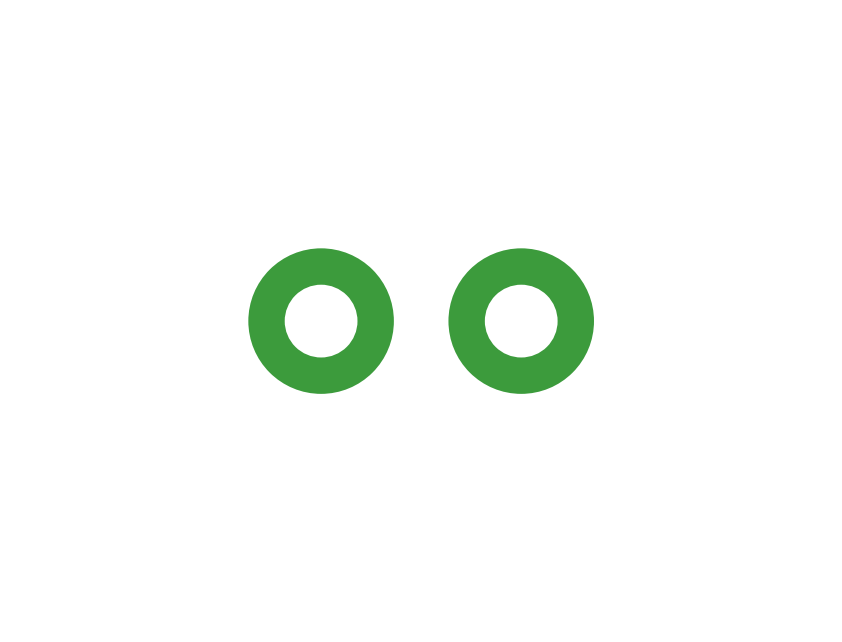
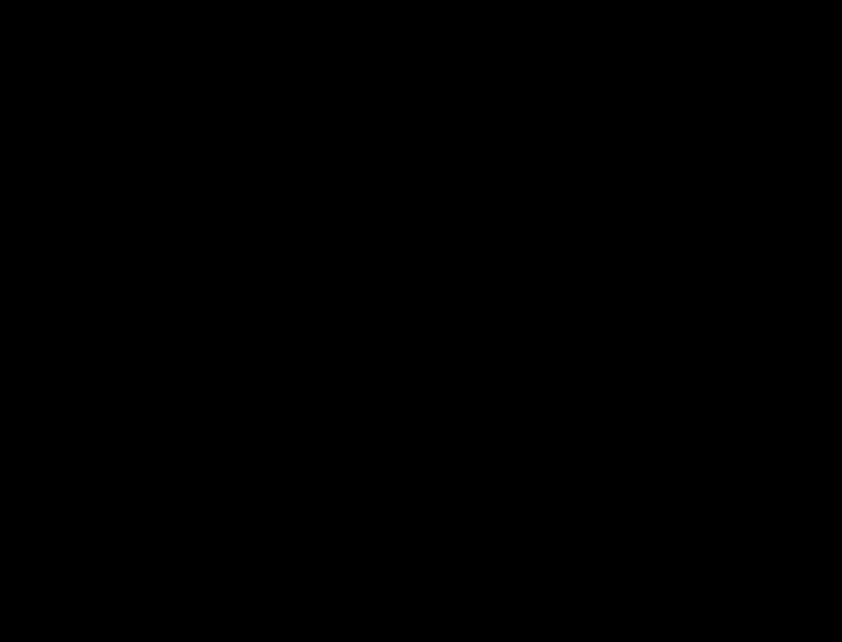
part: (421, 321) -> none

